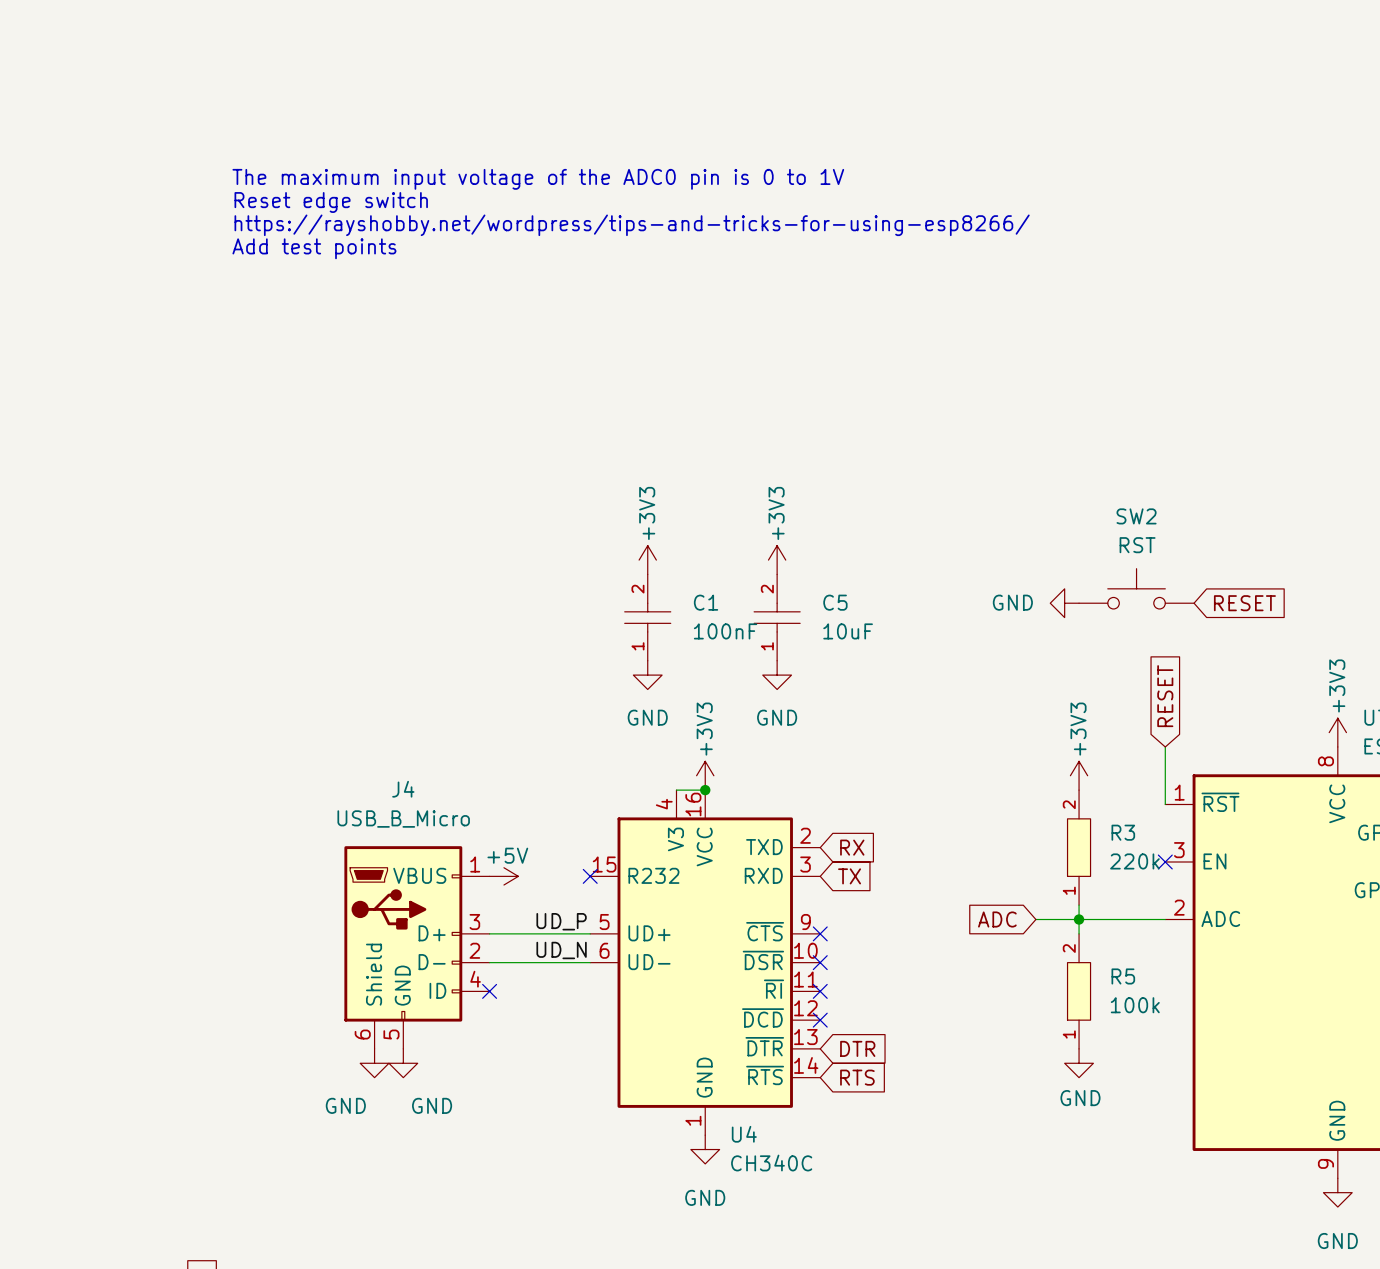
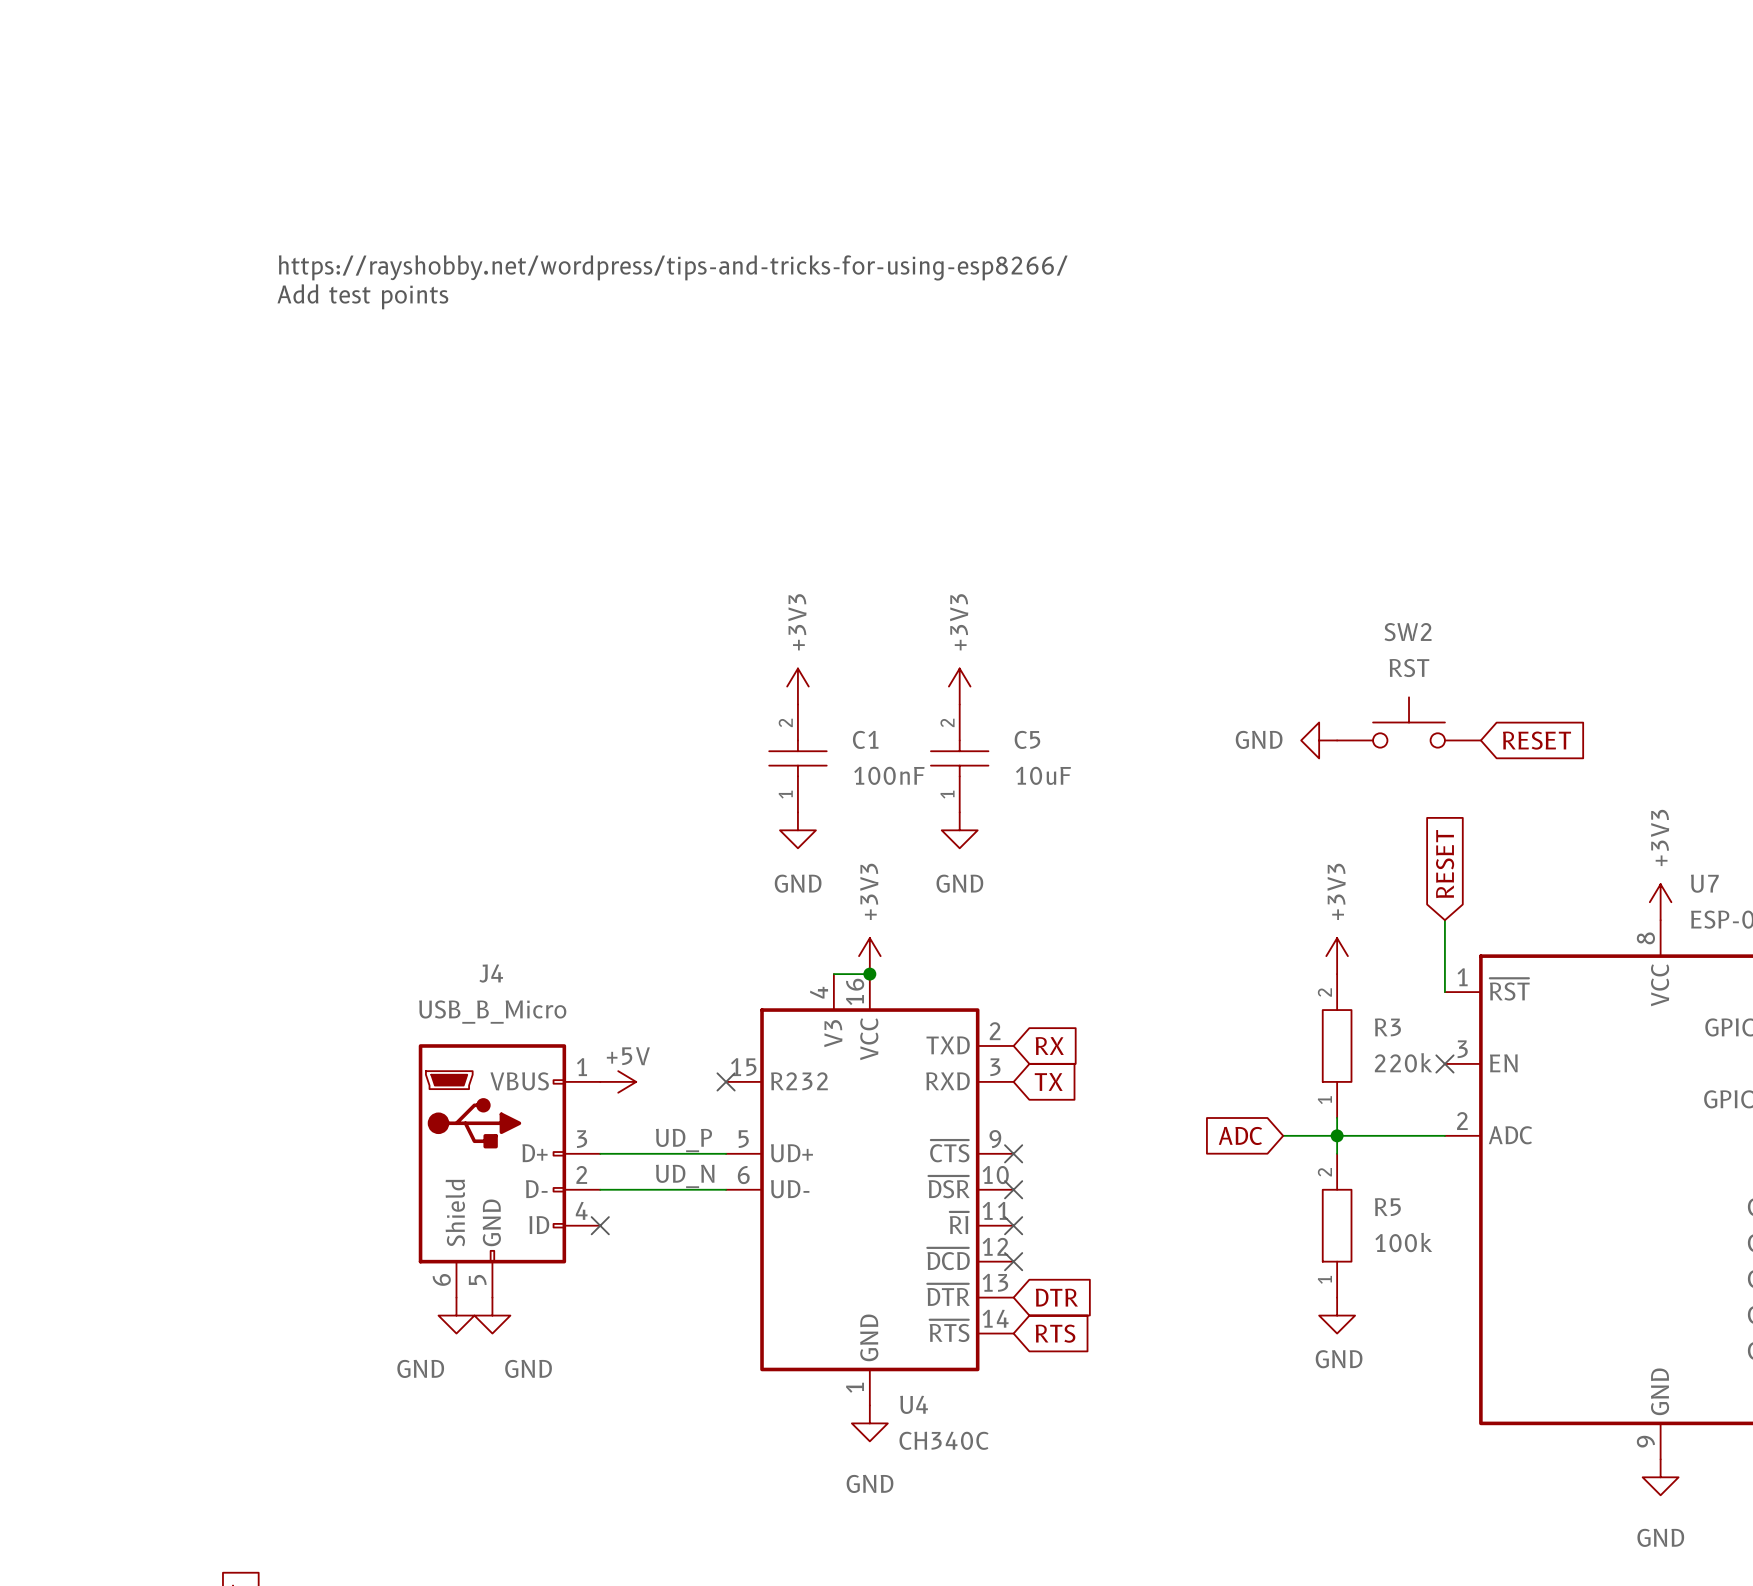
text: The maximum input voltage of the ADC0 pin is 0 to 1V (538, 179) -> none
text: Reset edge switch (331, 202) -> none

